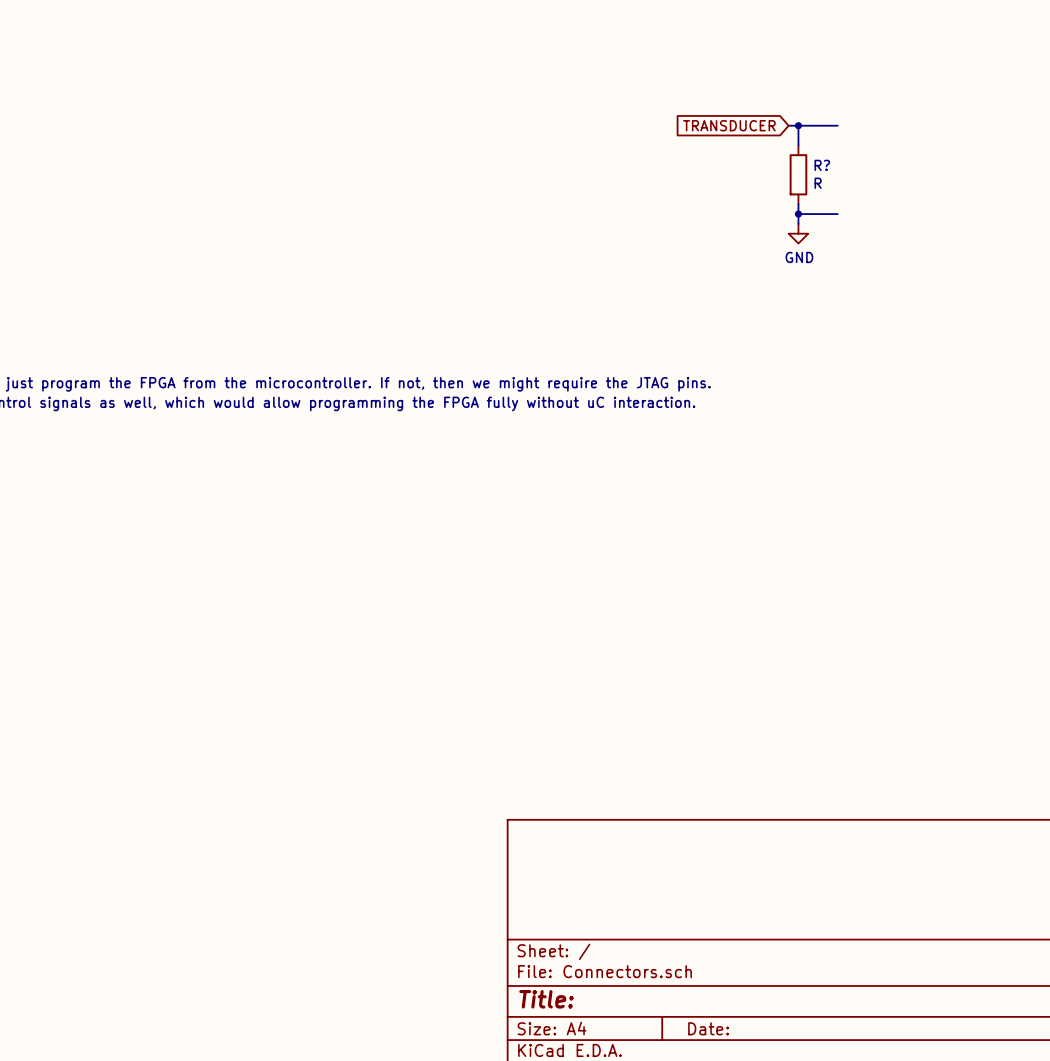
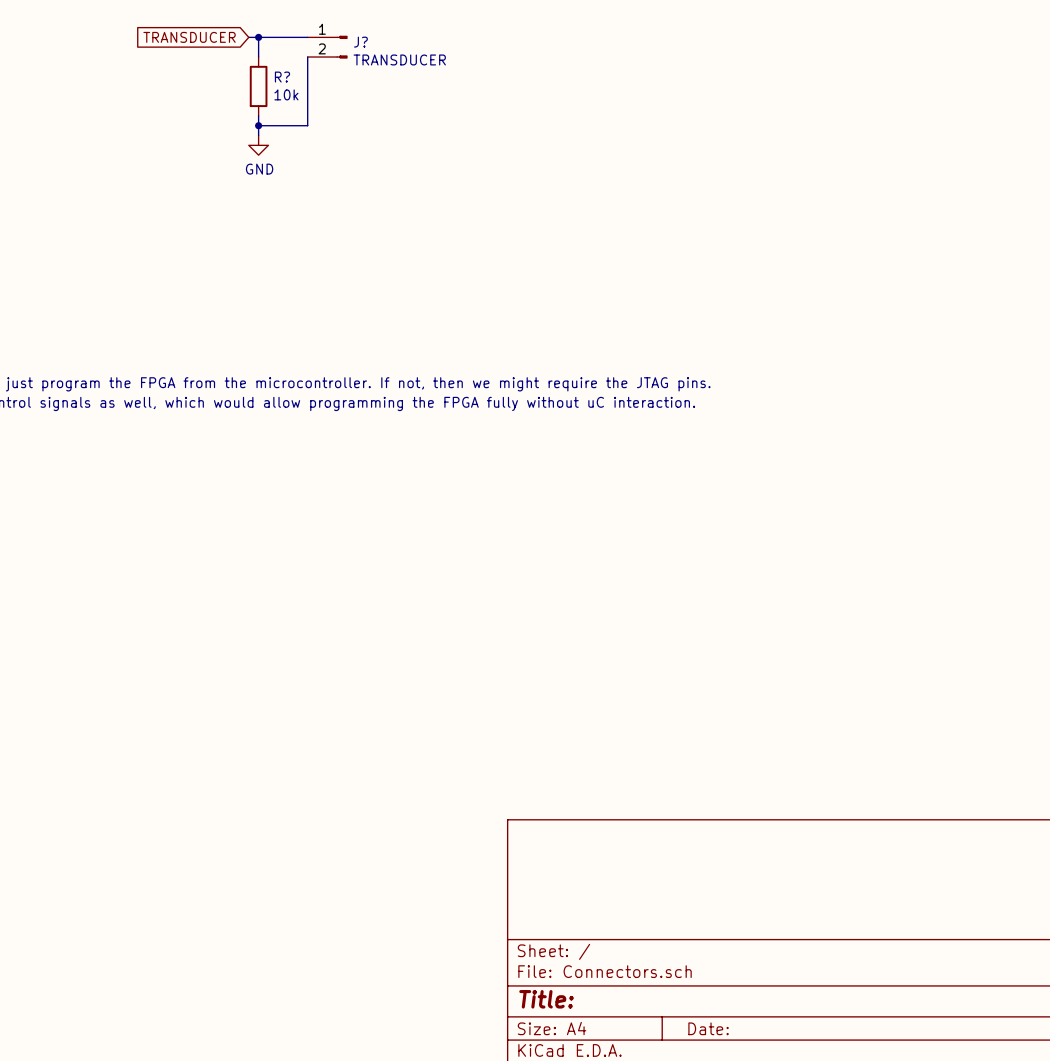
global label: none -> TRANSDUCER (189, 37)
wire: none -> (248, 37) (307, 37)
wire: none -> (258, 37) (258, 57)
junction: none -> (258, 37)
J?: none -> TRANSDUCER (327, 47)
wire: none -> (307, 57) (307, 125) (258, 125)
R?: none -> 10k (258, 86)
wire: none -> (258, 115) (258, 135)
junction: none -> (258, 125)
global label: TRANSDUCER (729, 125) -> none
wire: (788, 125) (837, 125) -> none
wire: (798, 125) (798, 145) -> none
junction: (798, 125) -> none
power symbol: none -> GND (258, 145)
R?: R (798, 174) -> none
wire: (798, 204) (798, 223) -> none
wire: (798, 214) (837, 214) -> none
junction: (798, 214) -> none
power symbol: GND (798, 233) -> none

